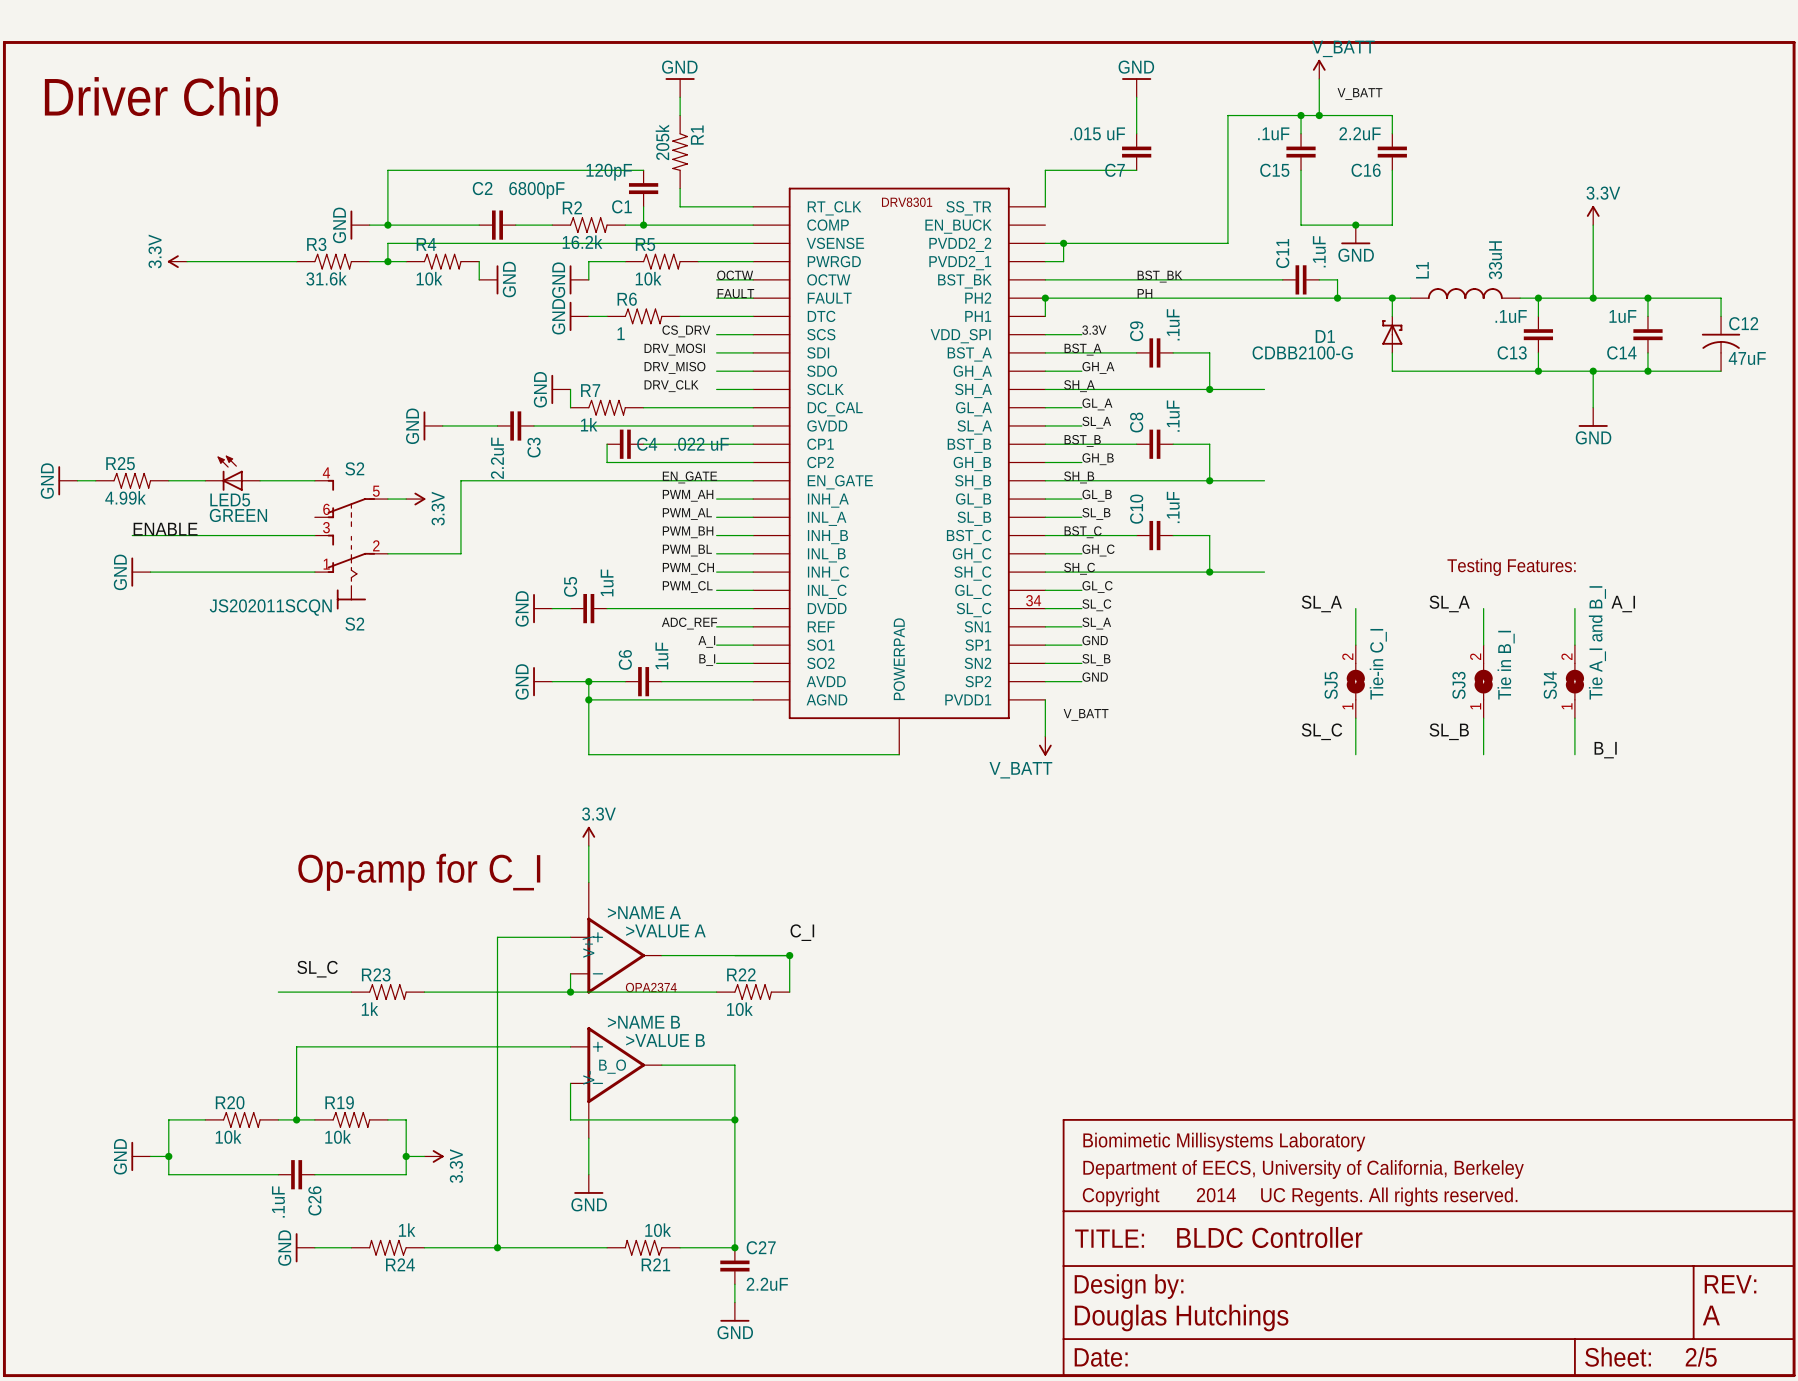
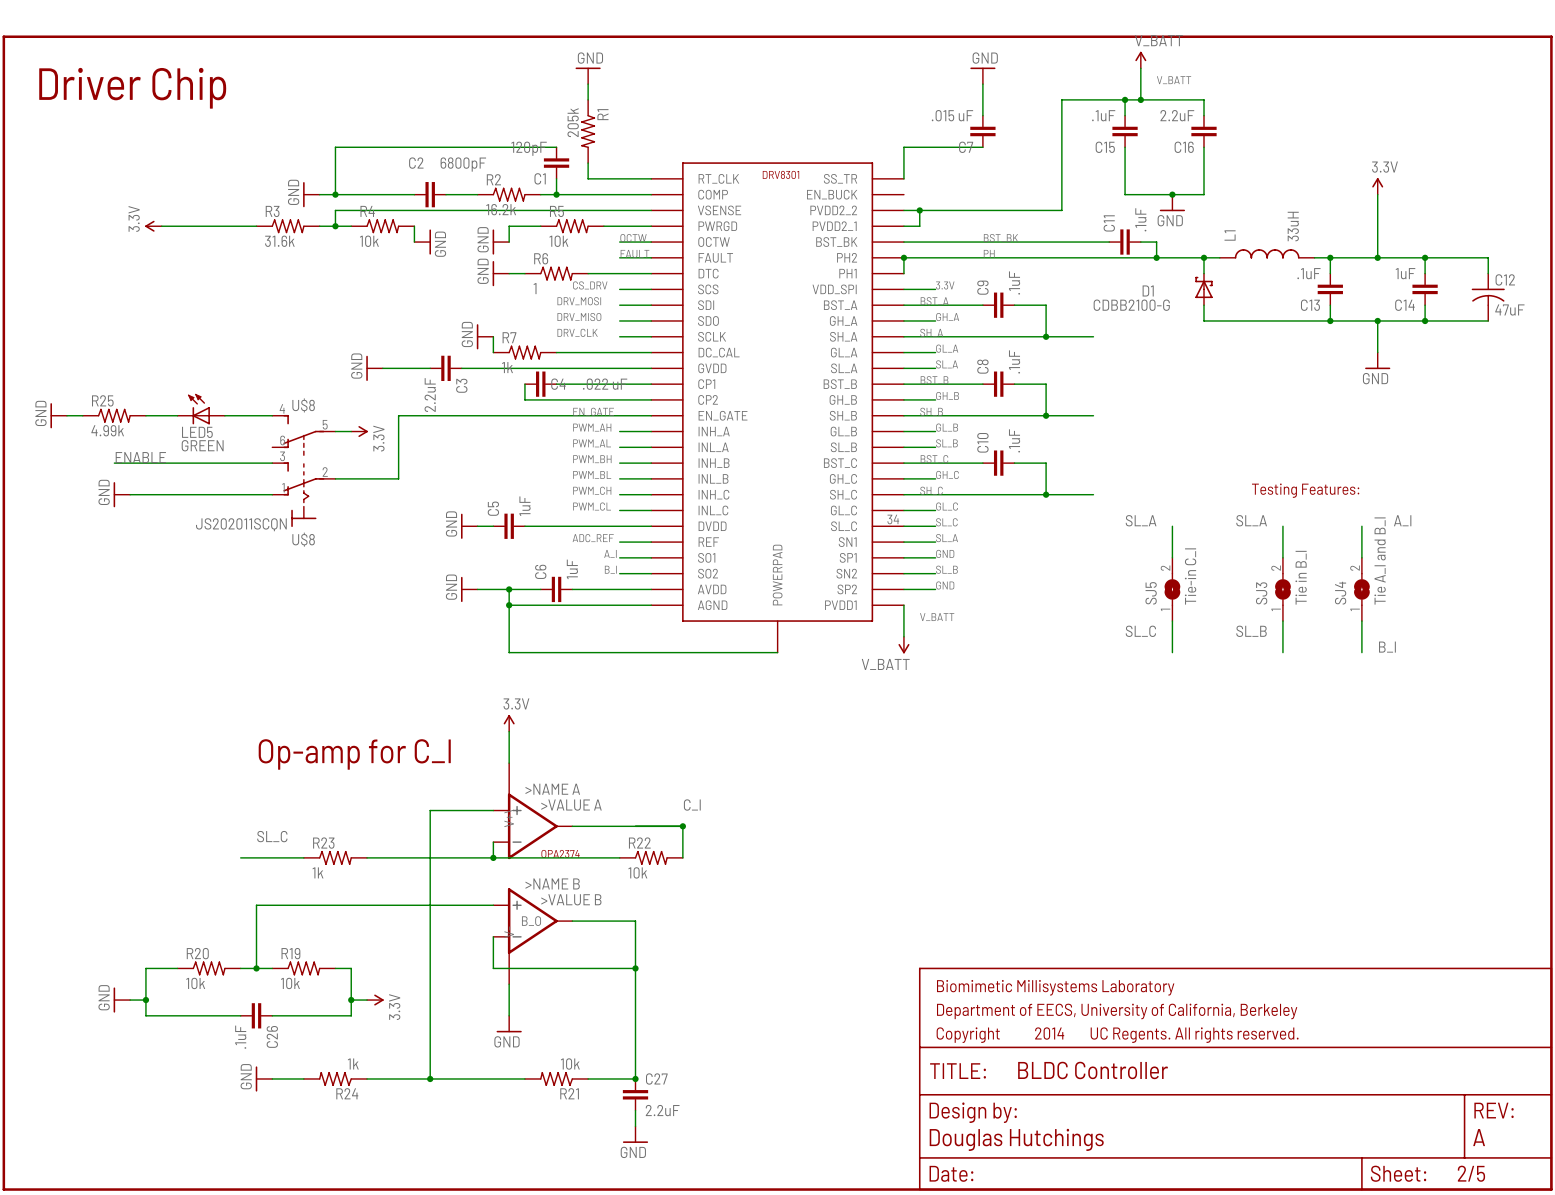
S2 name: S2 (354, 468) -> U$8 (303, 405)
S2 name: S2 (354, 624) -> U$8 (303, 539)

